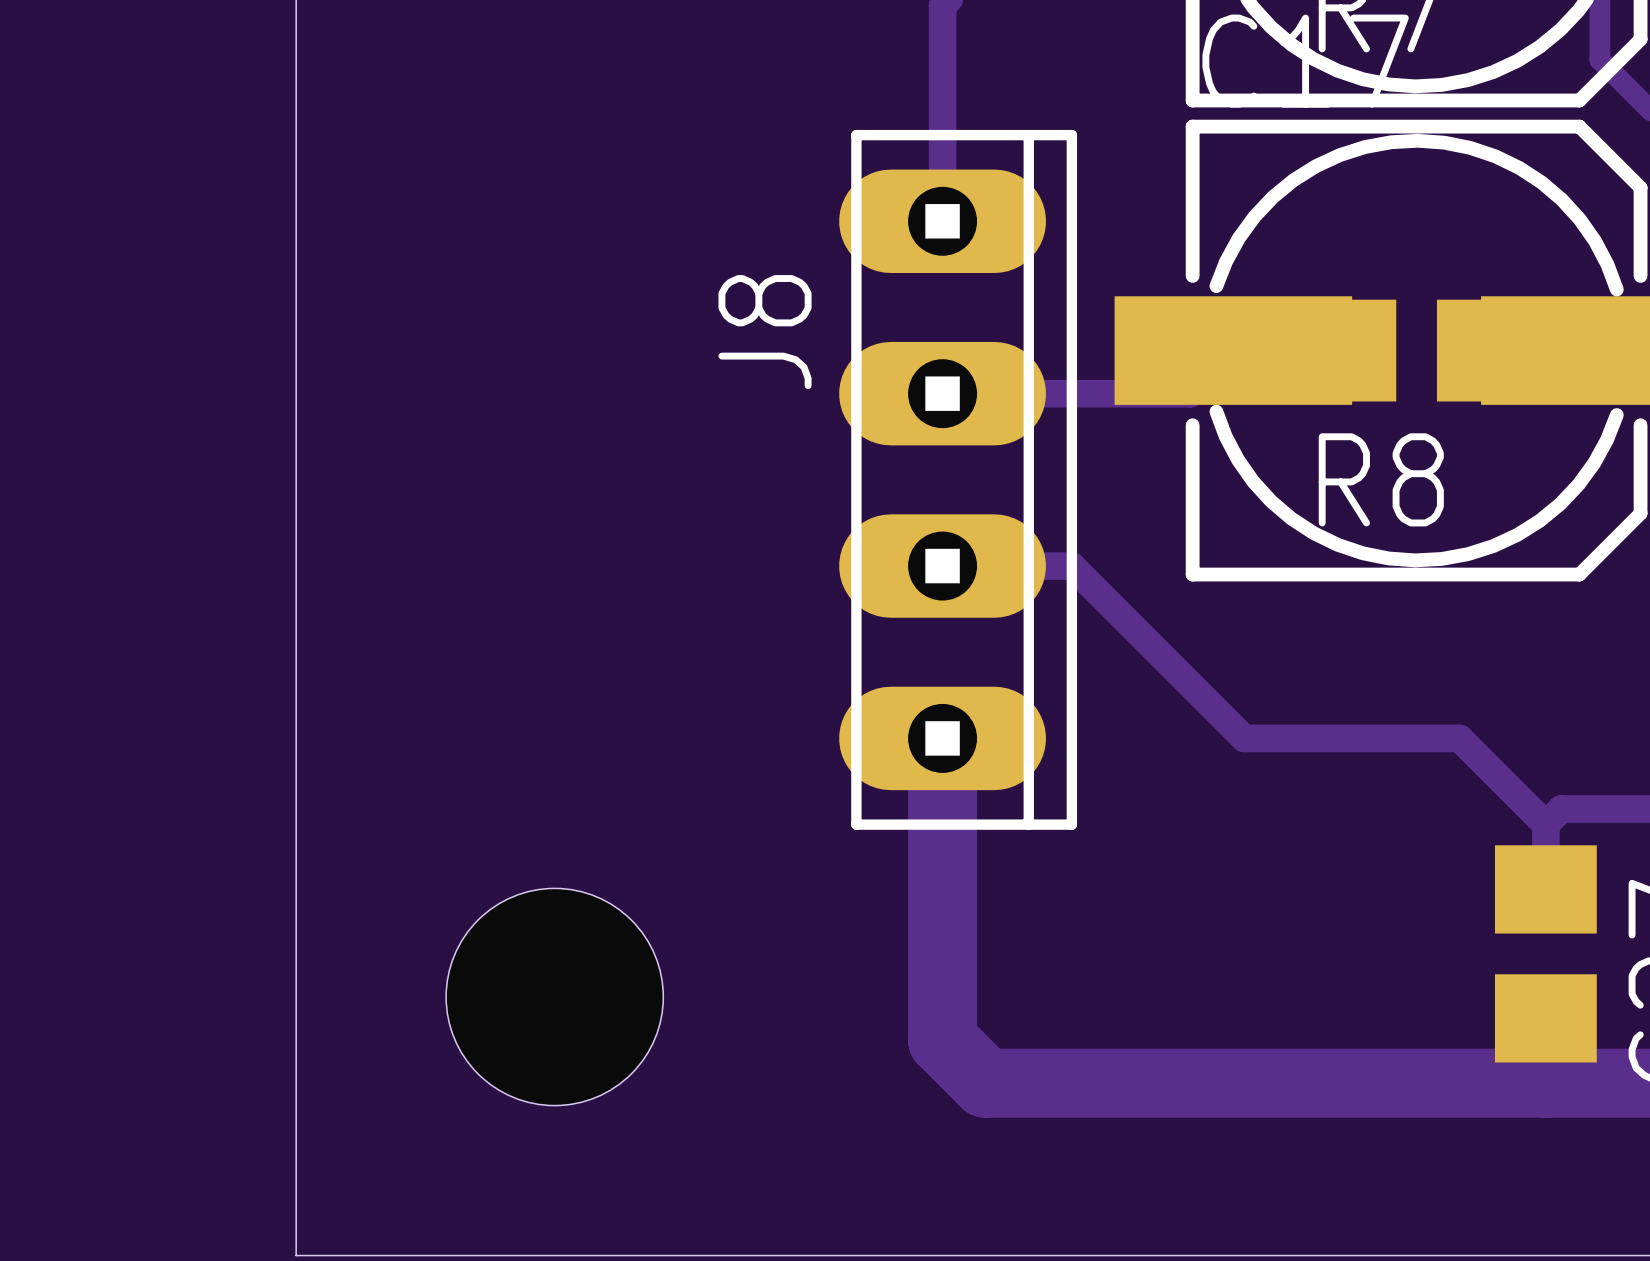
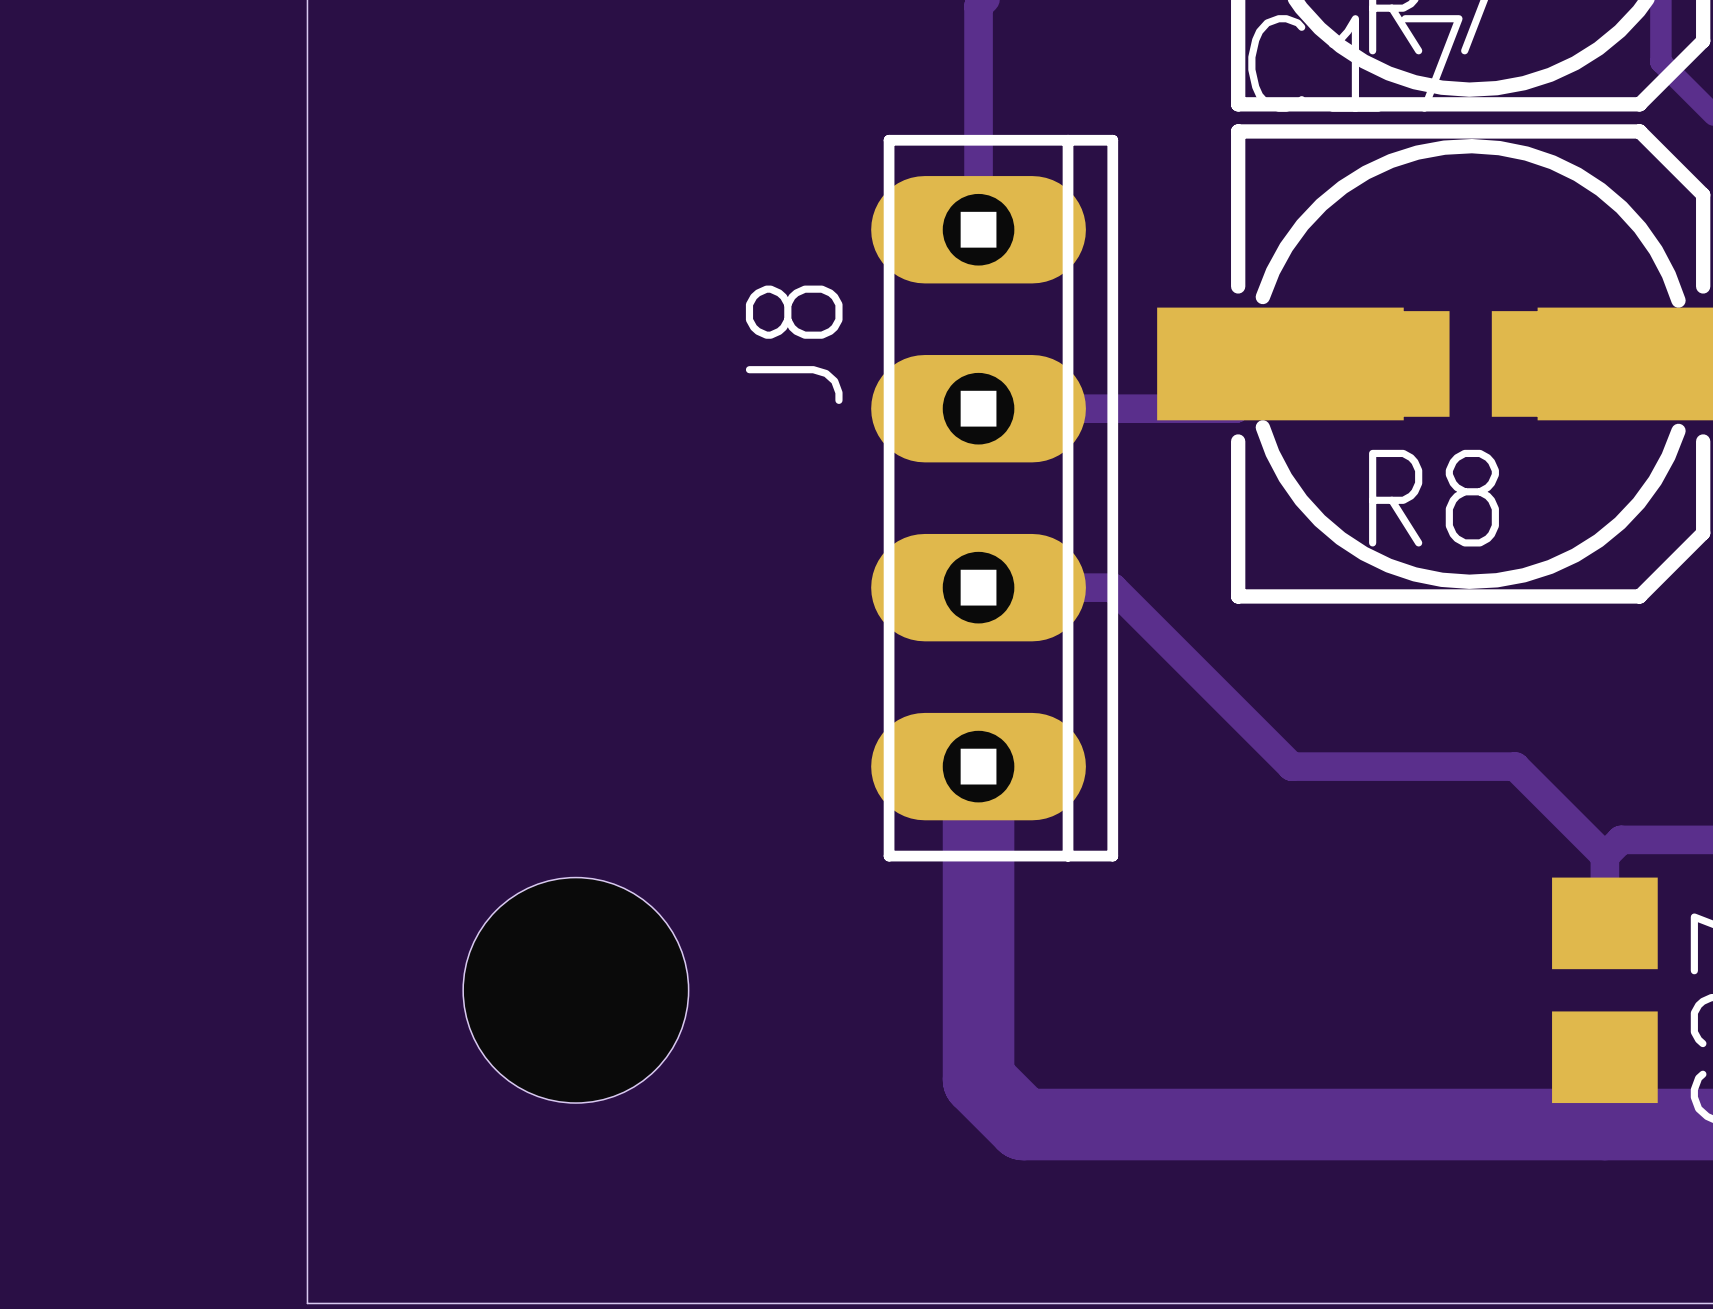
hole position: (554, 996) -> (575, 990)

